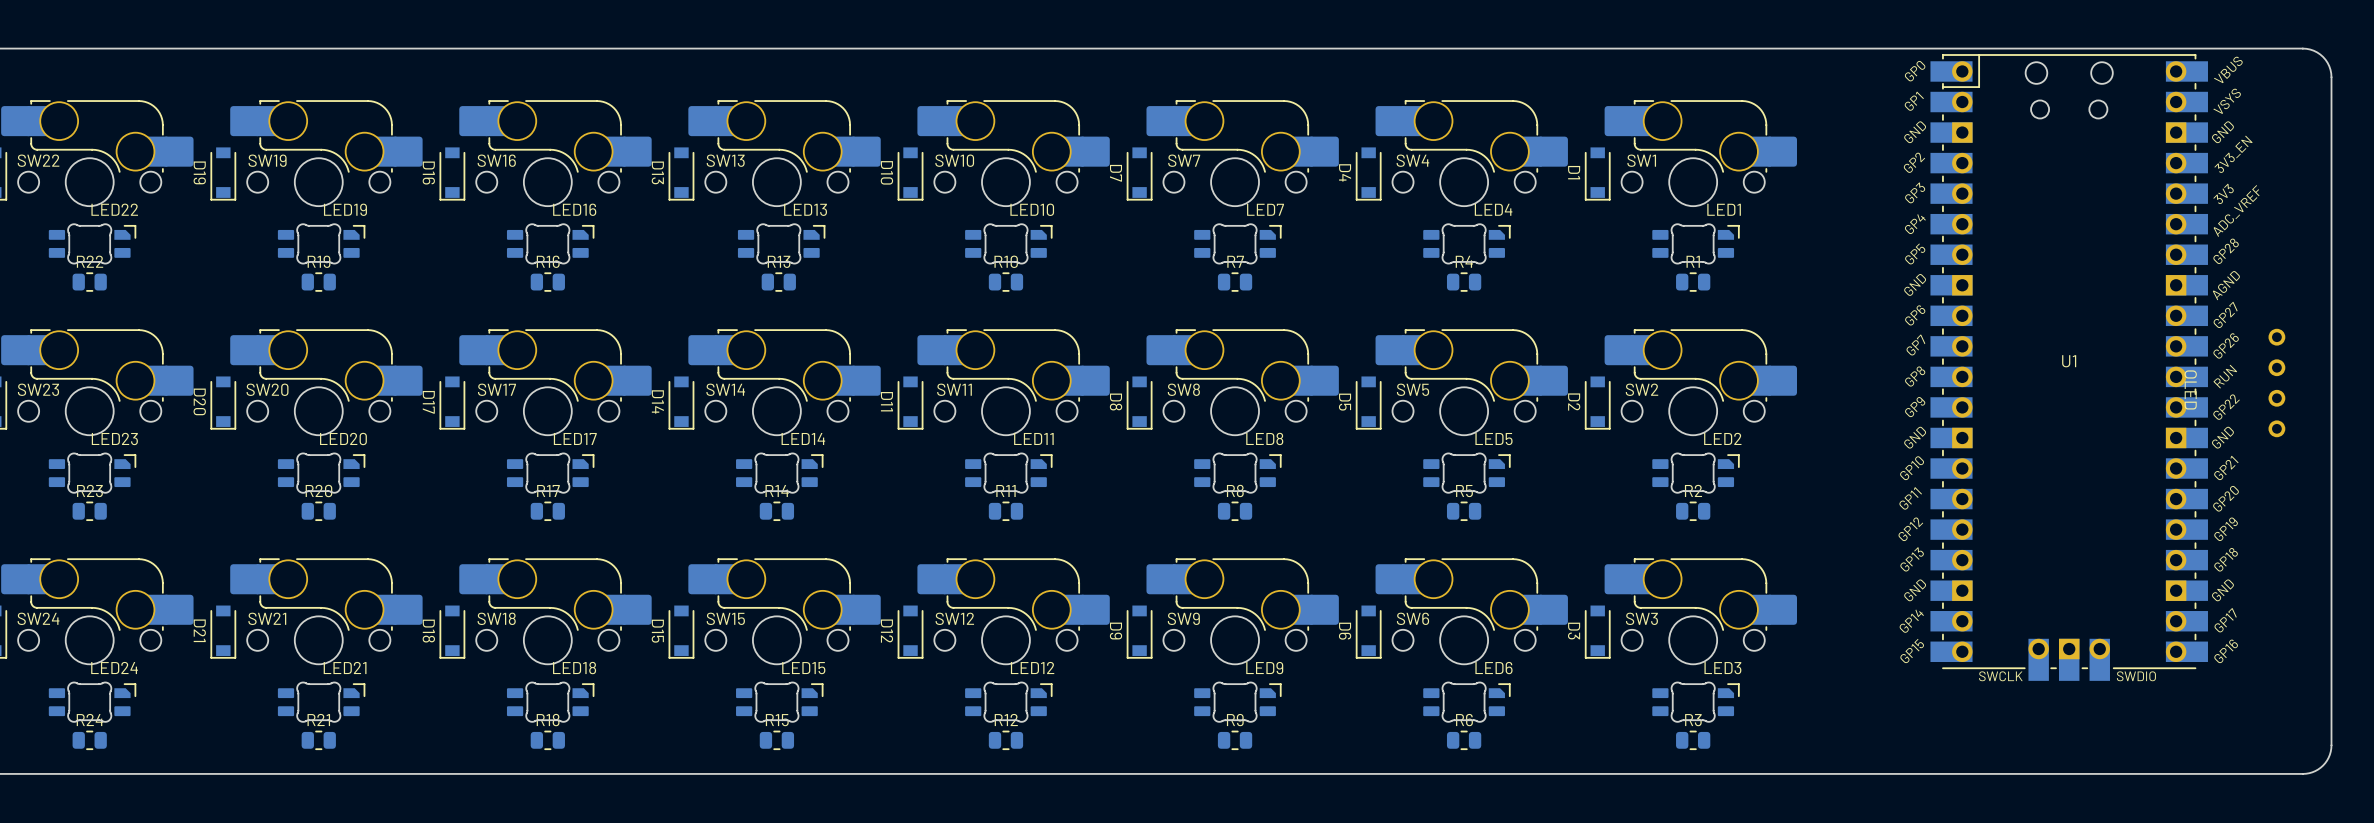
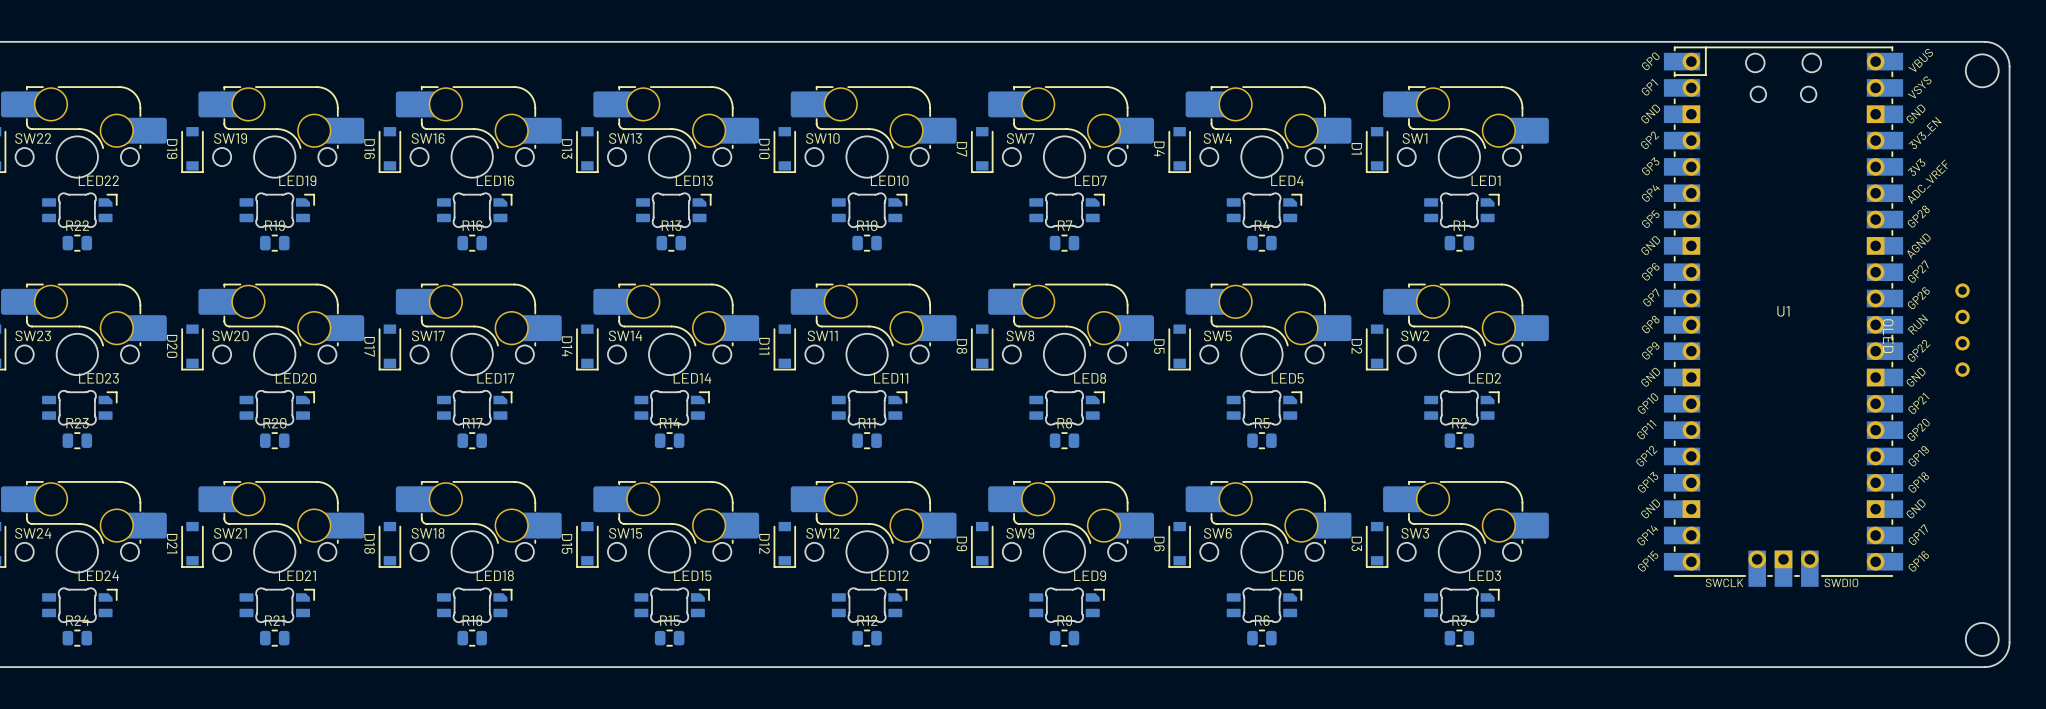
round board edge: none -> [1965, 53, 2000, 88]
round board edge: none -> [1965, 622, 2000, 657]

